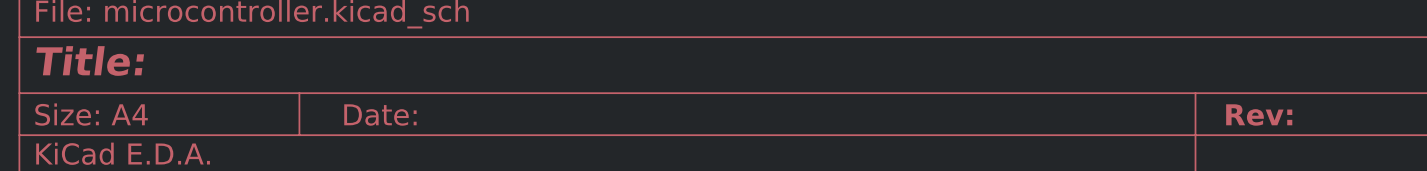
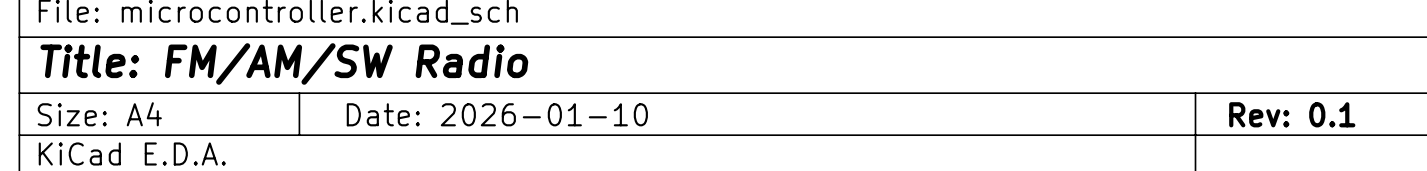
title block: Title: (90, 61) -> Title: FM/AM/SW Radio (284, 63)
title block: Date: (380, 114) -> Date: 2026-01-10 (497, 114)
title block: Rev: (1259, 114) -> Rev: 0.1 (1292, 114)

